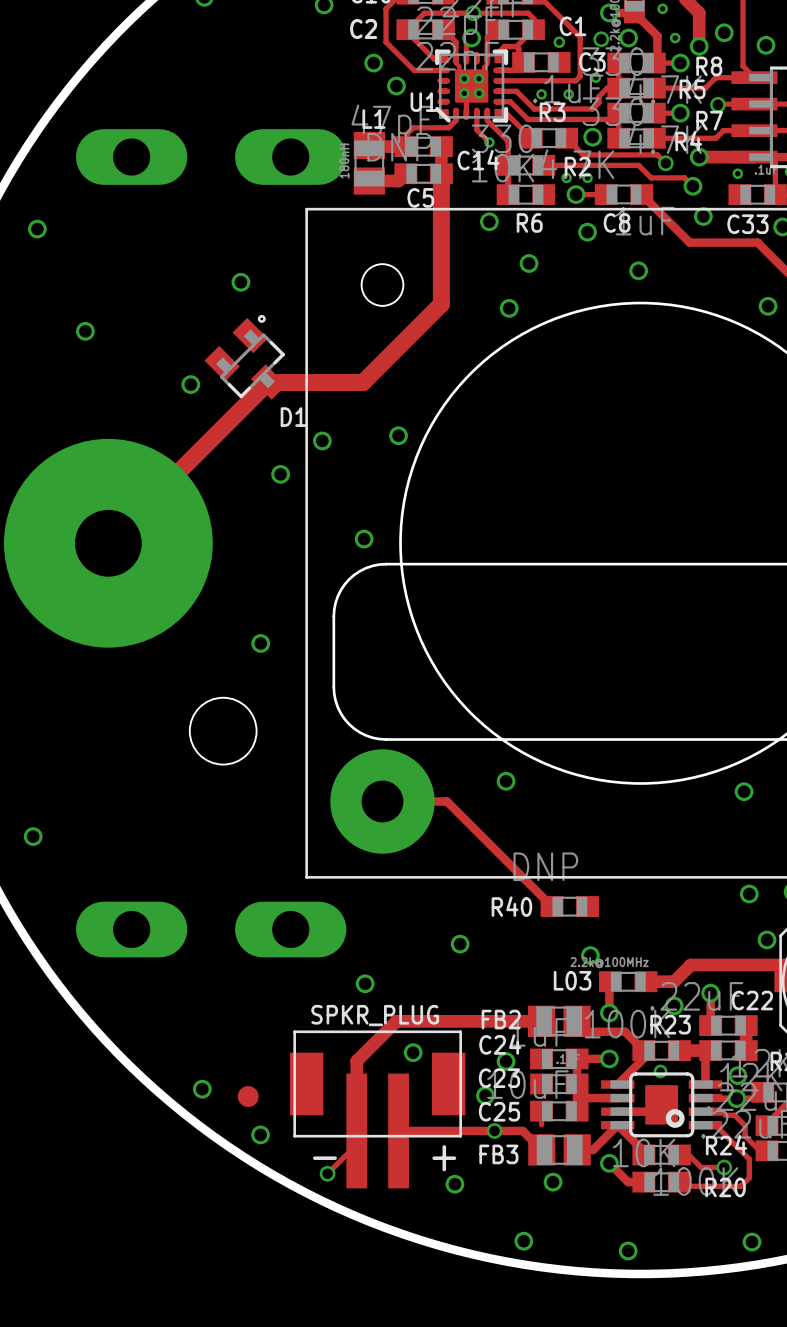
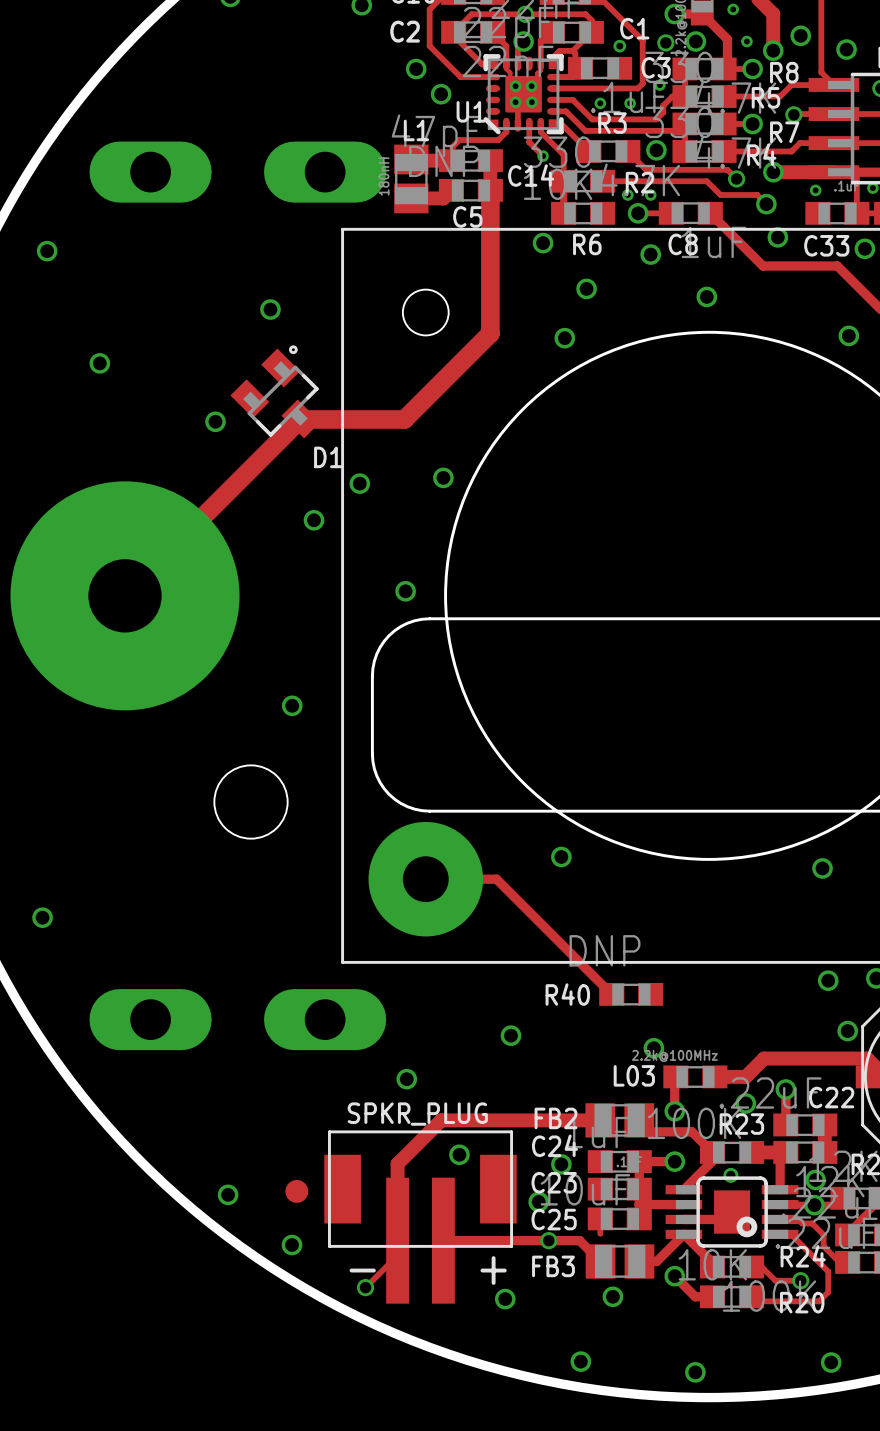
part position: (248, 1096) -> (296, 1191)

